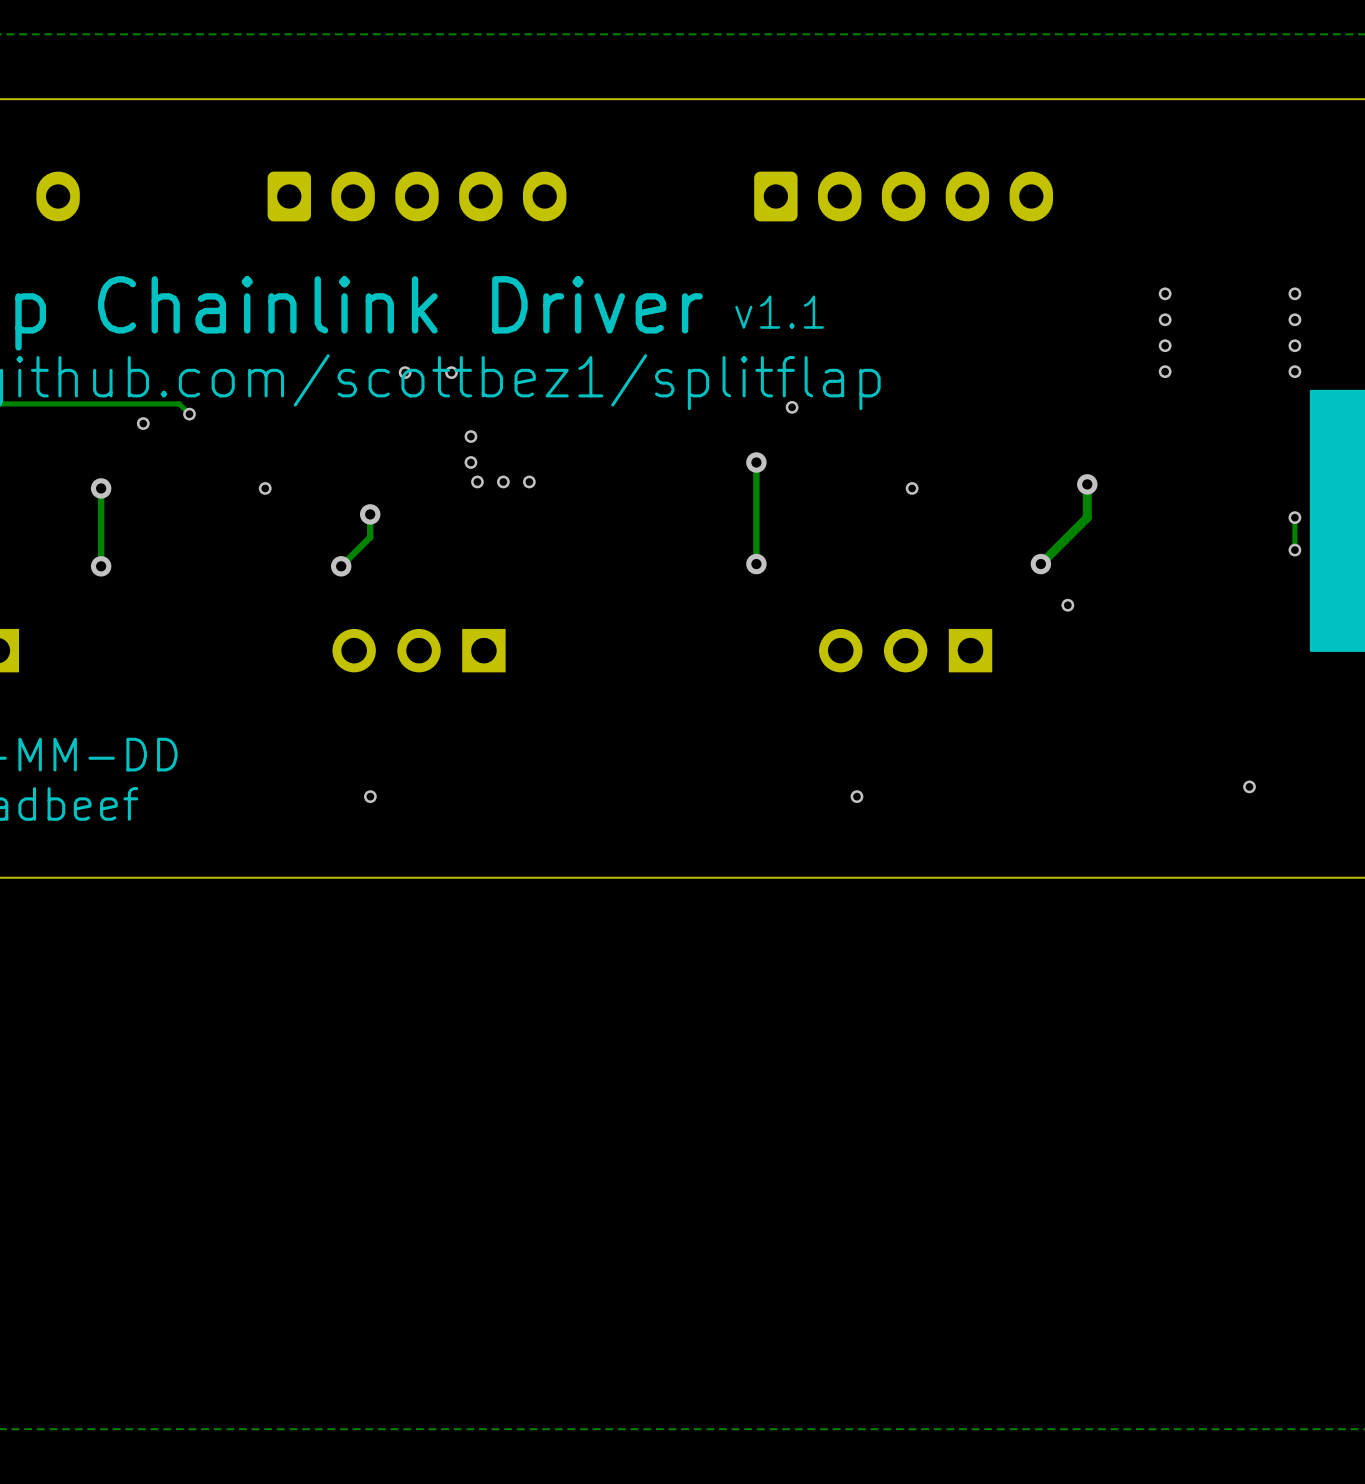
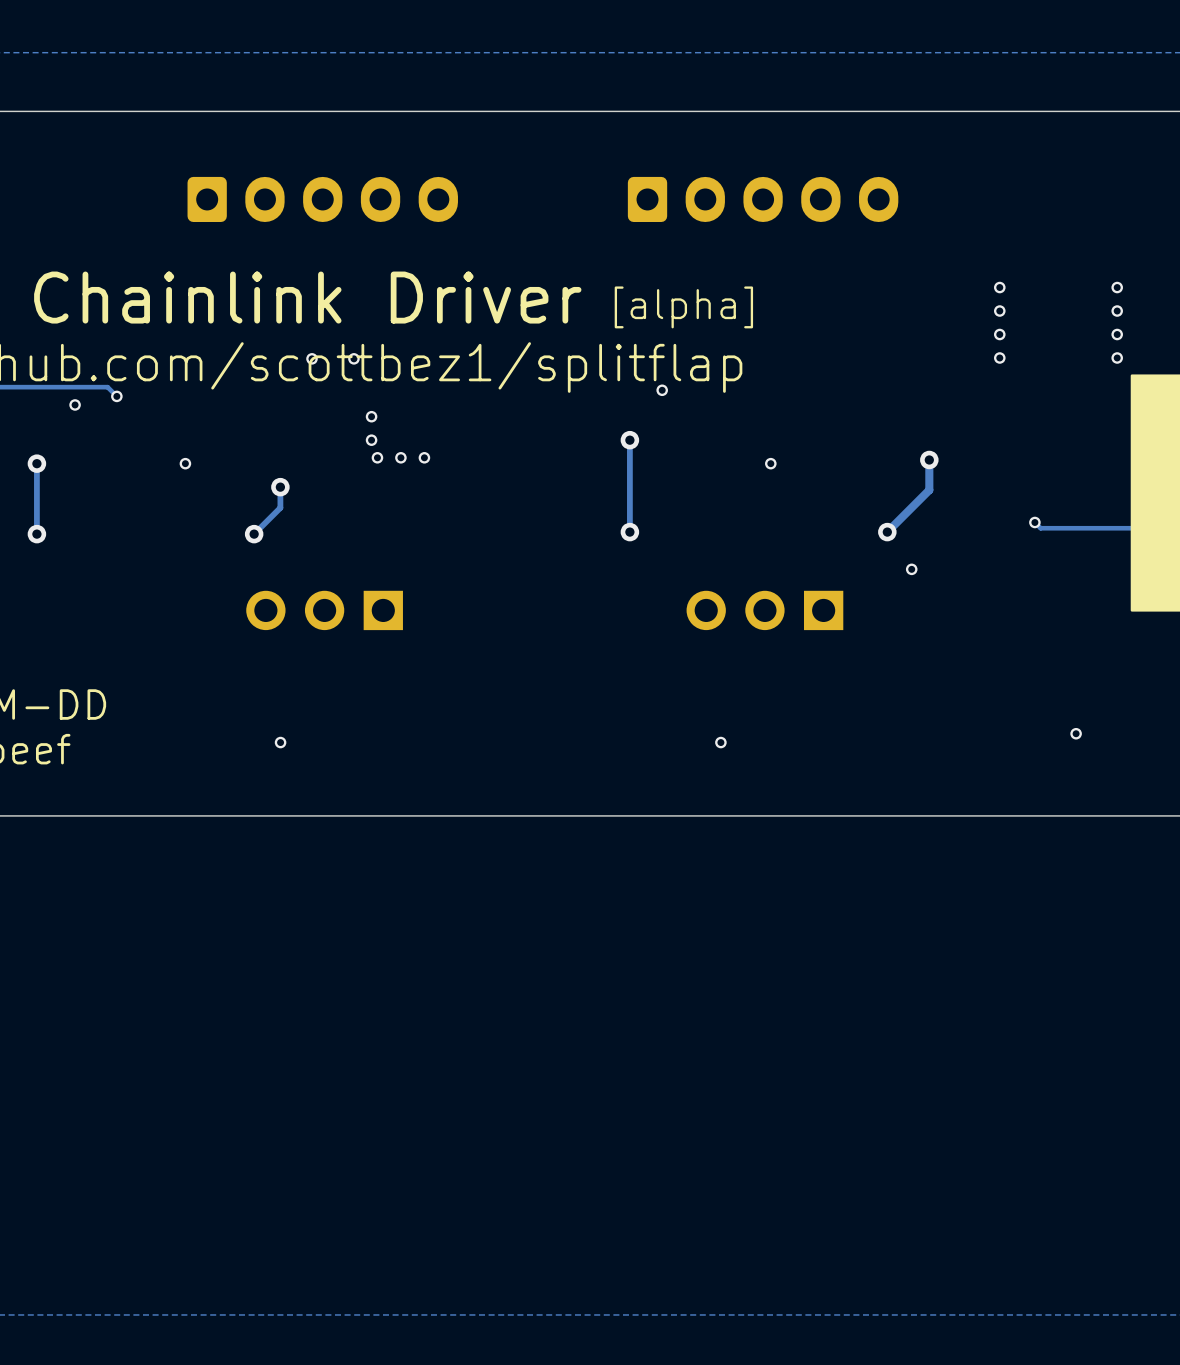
text: v1.1 (779, 312) -> [alpha] (683, 307)
track: (1294, 517) (1294, 550) -> none
via: (1294, 517) -> none
via: (1294, 550) -> none
track: none -> (1034, 522) (1040, 528) (1158, 528)
via: none -> (1034, 522)

